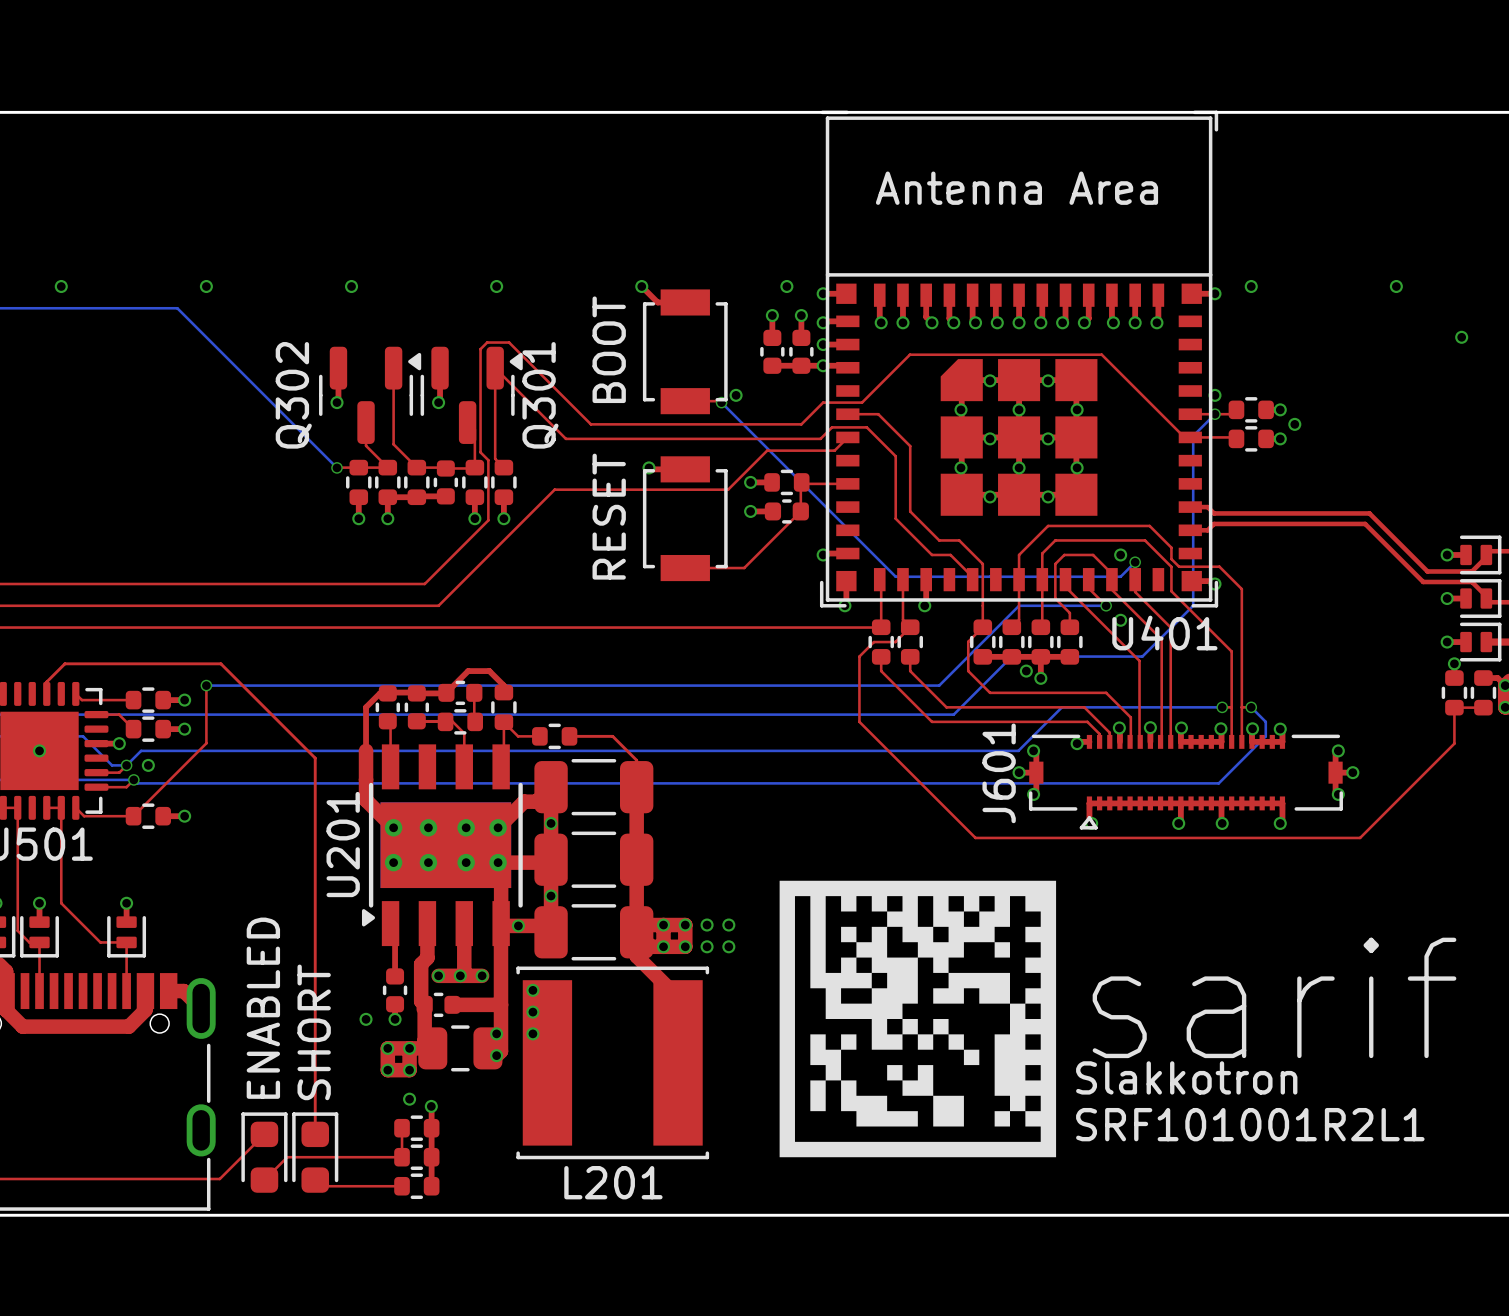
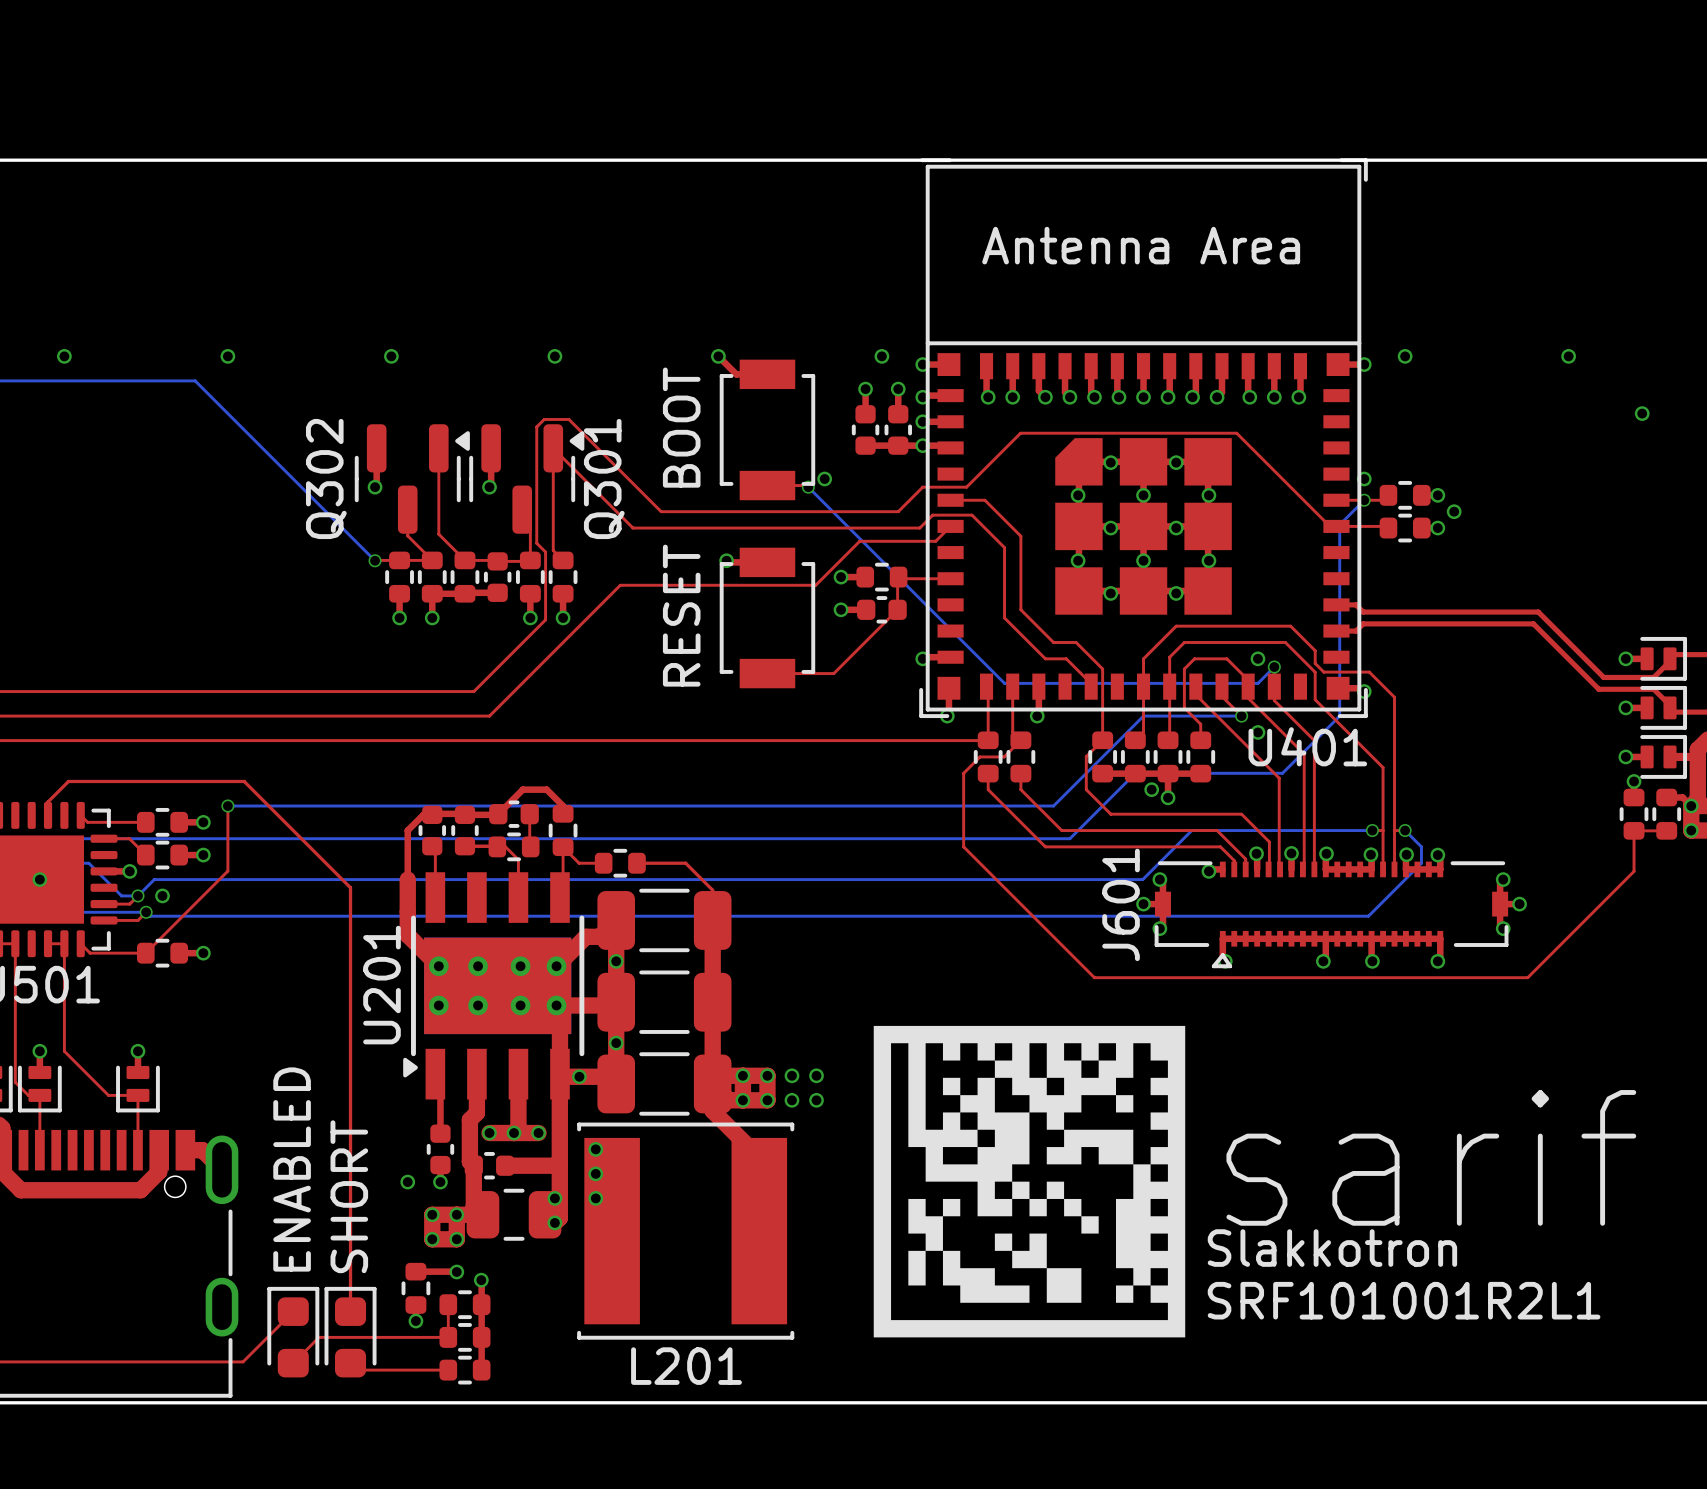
top track: none -> (415, 1271) (456, 1271)
part: none -> (415, 1288)
via: none -> (415, 1321)

